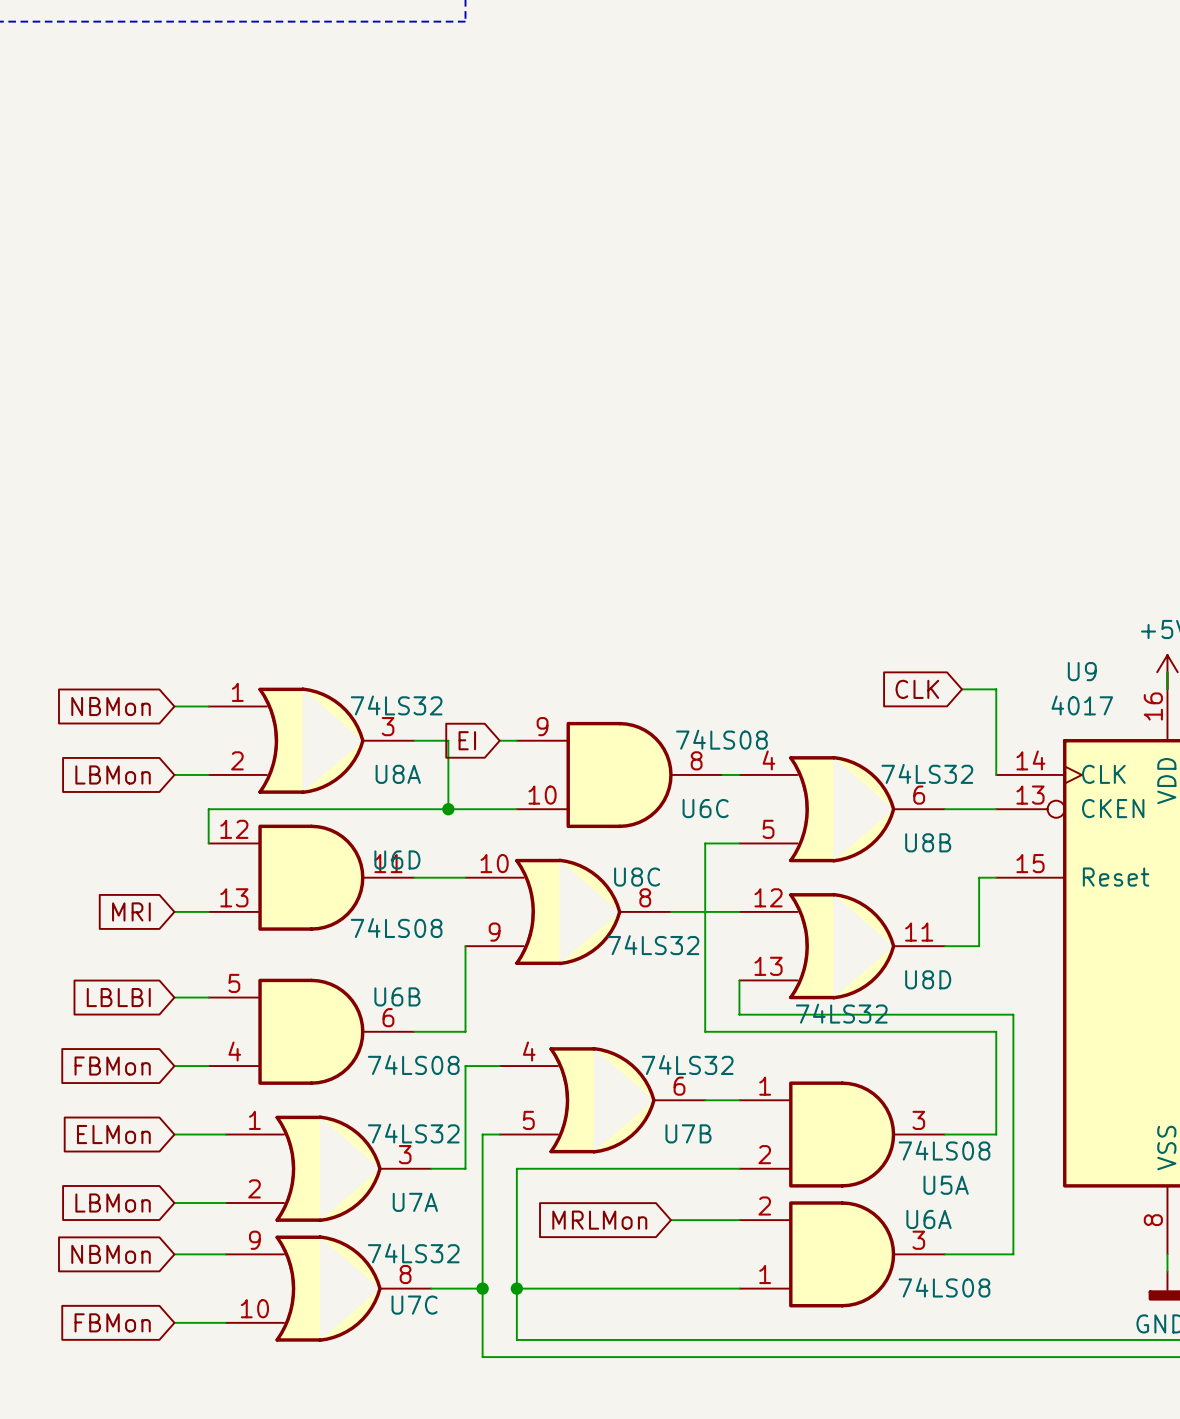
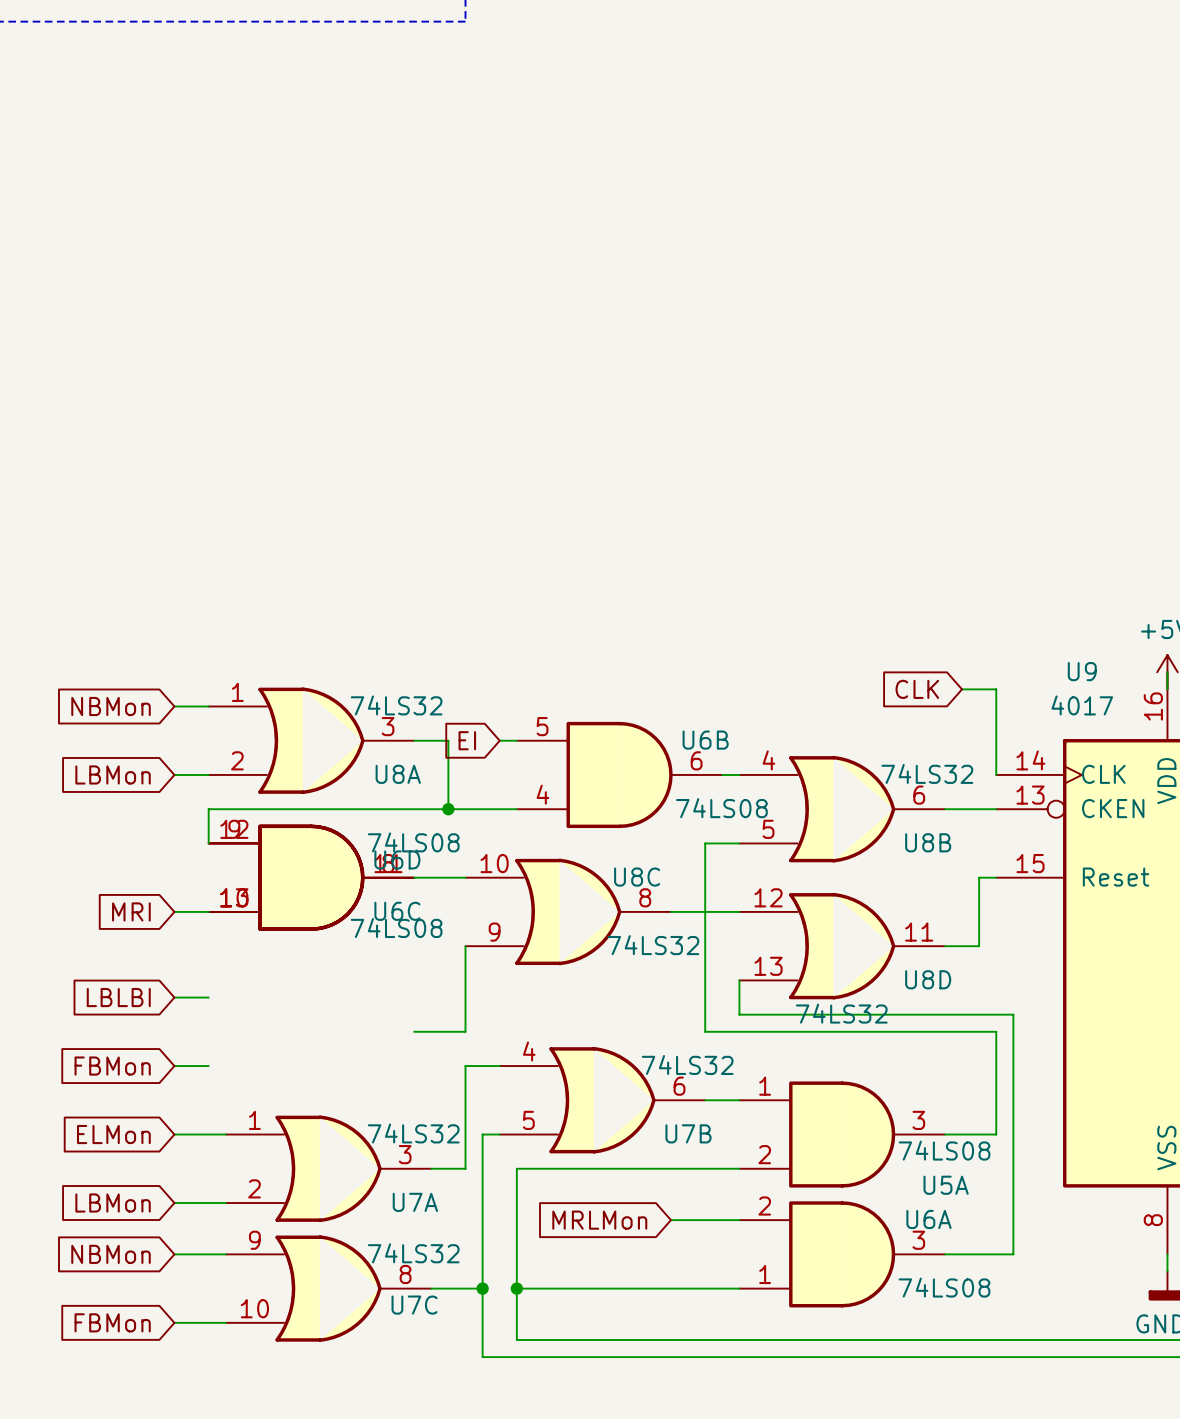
U6C position: (619, 774) -> (311, 877)
U6B position: (311, 1031) -> (619, 774)

